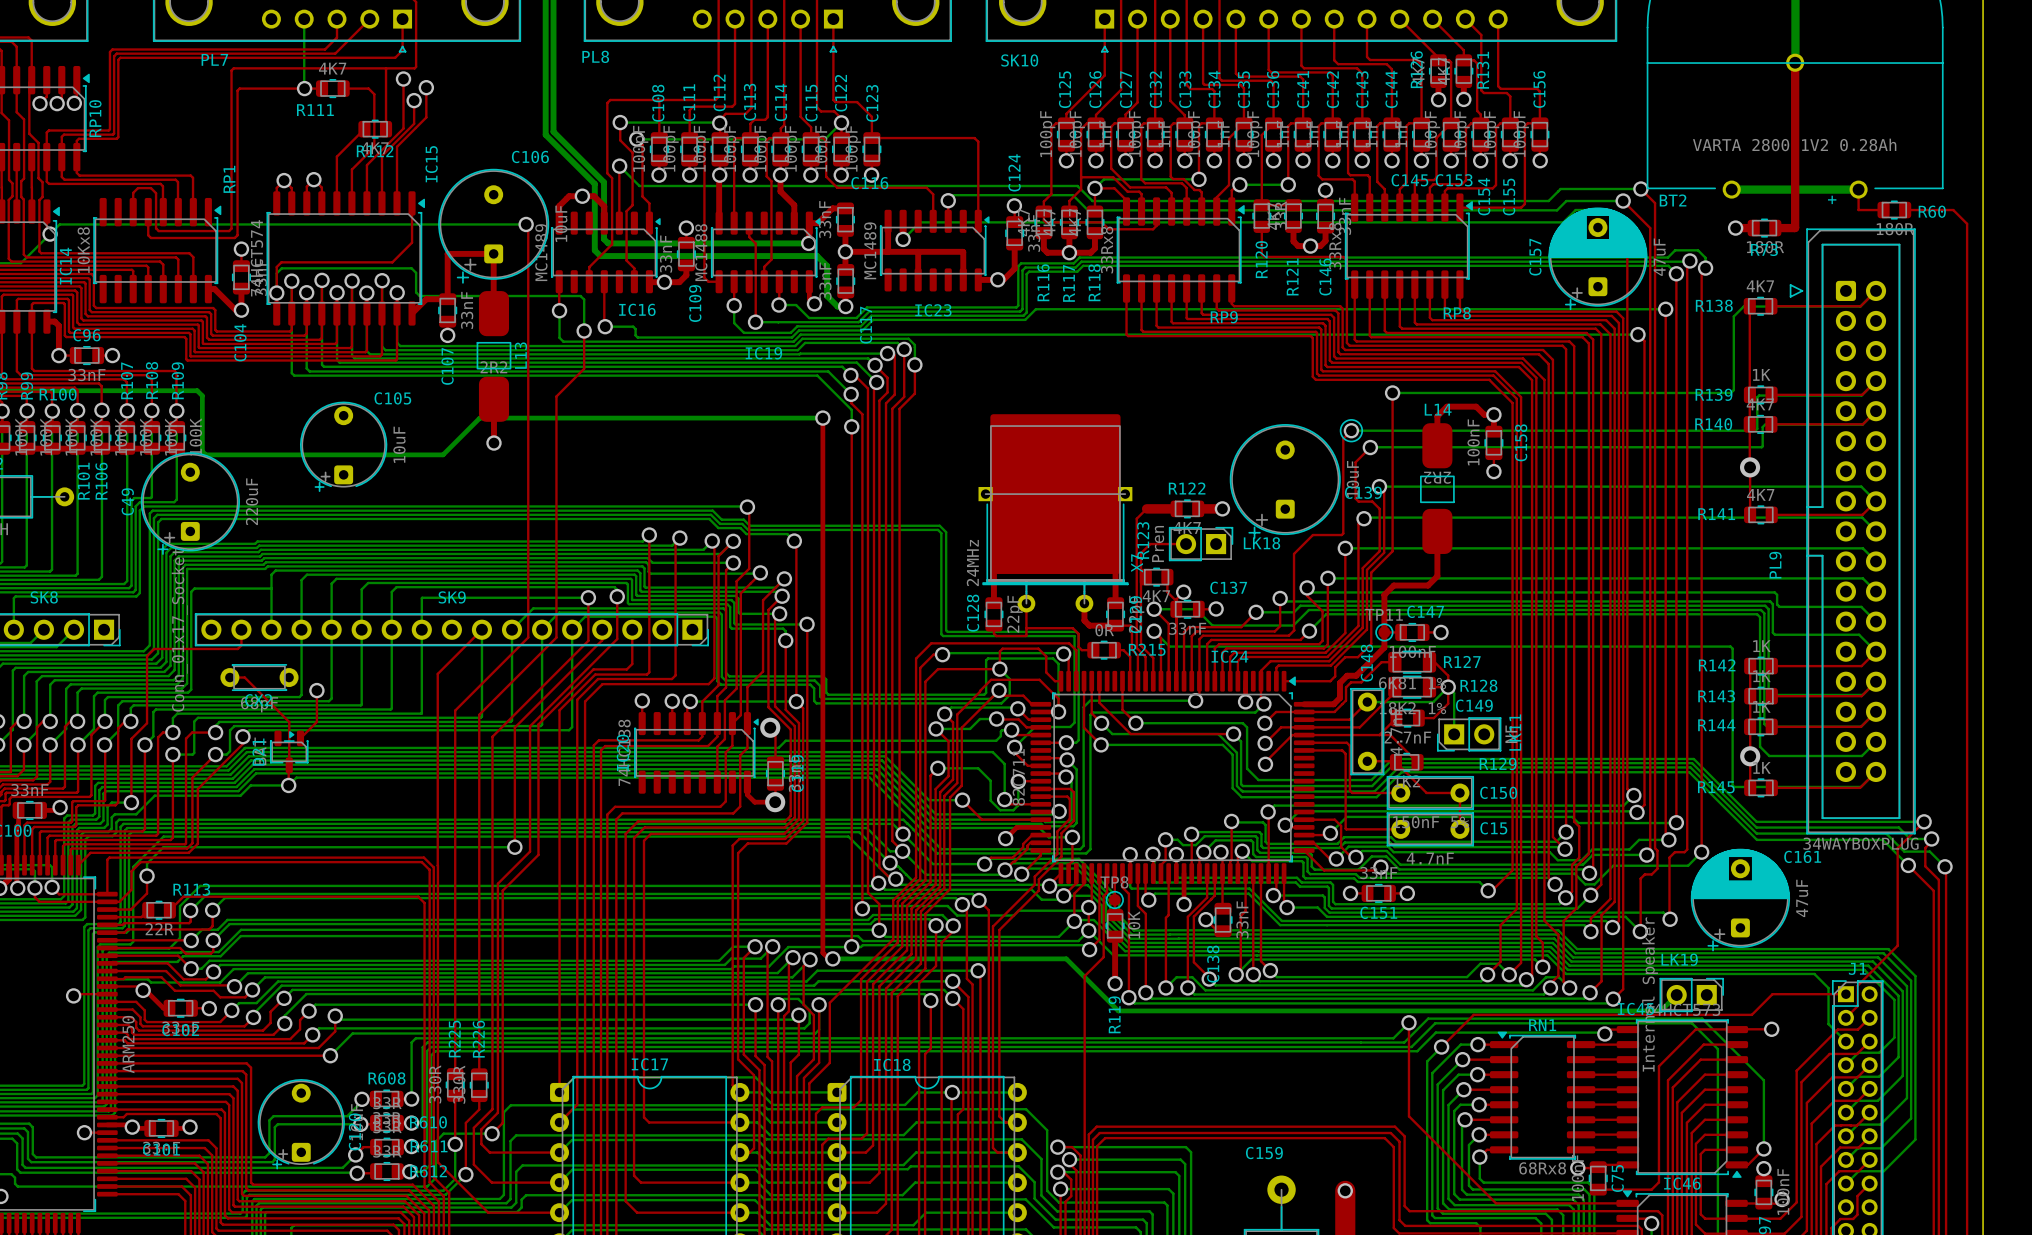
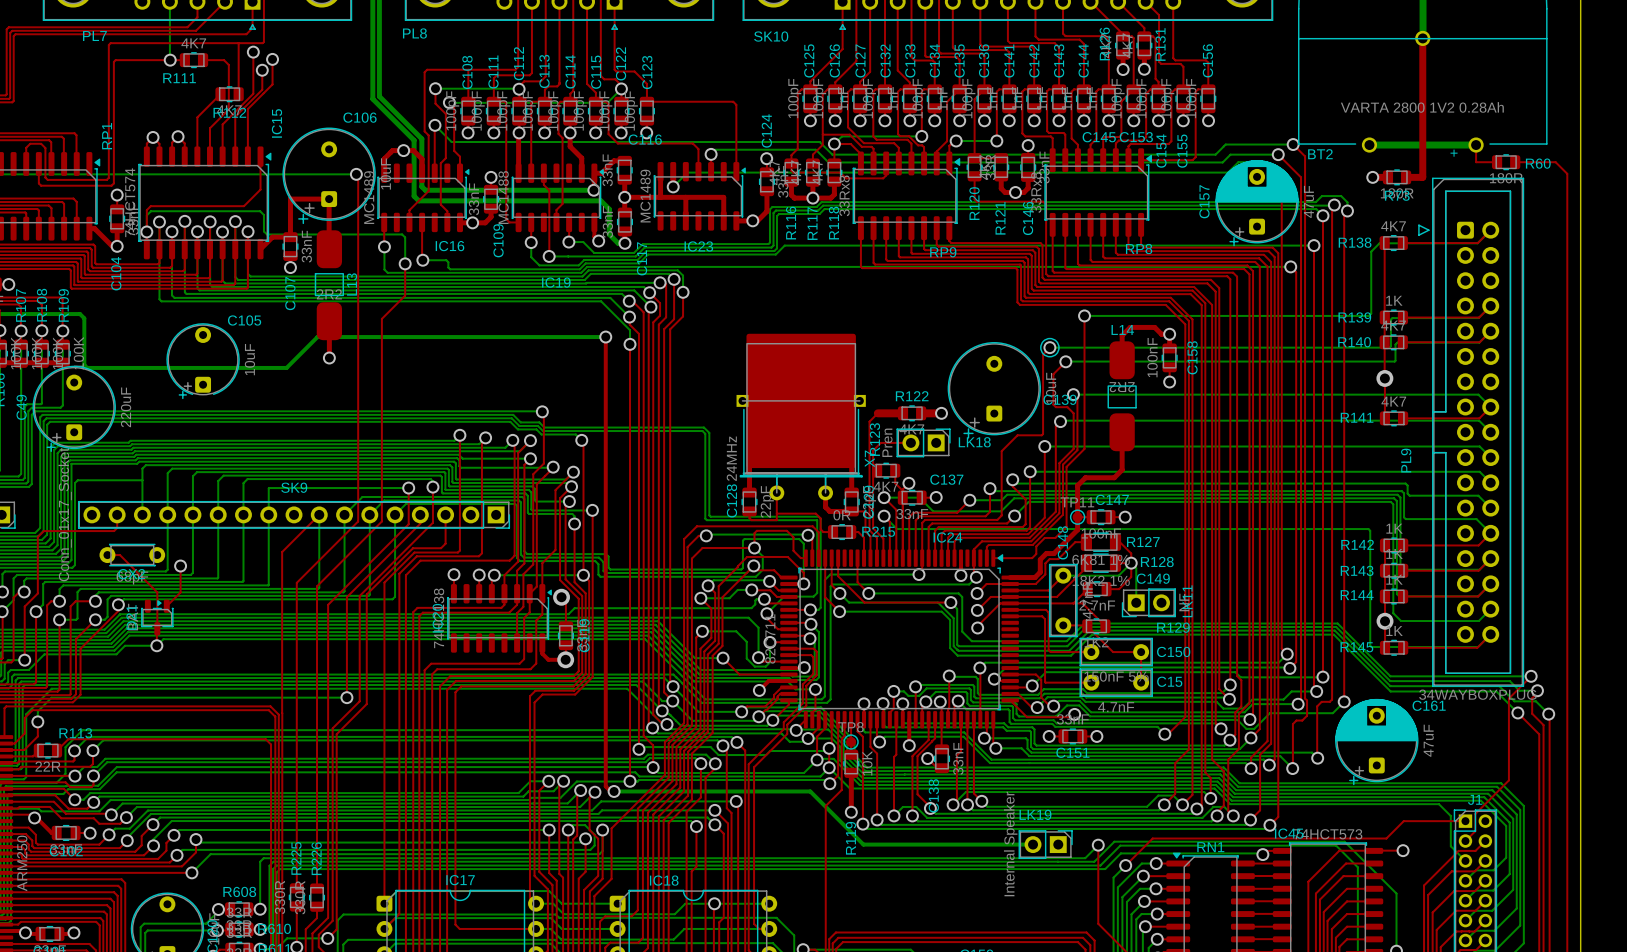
bottom track: (1676, 995) (1660, 1010) (1118, 1010) -> (1033, 844) (863, 844) (854, 835)
LK19 position: (1691, 995) -> (1045, 844)

